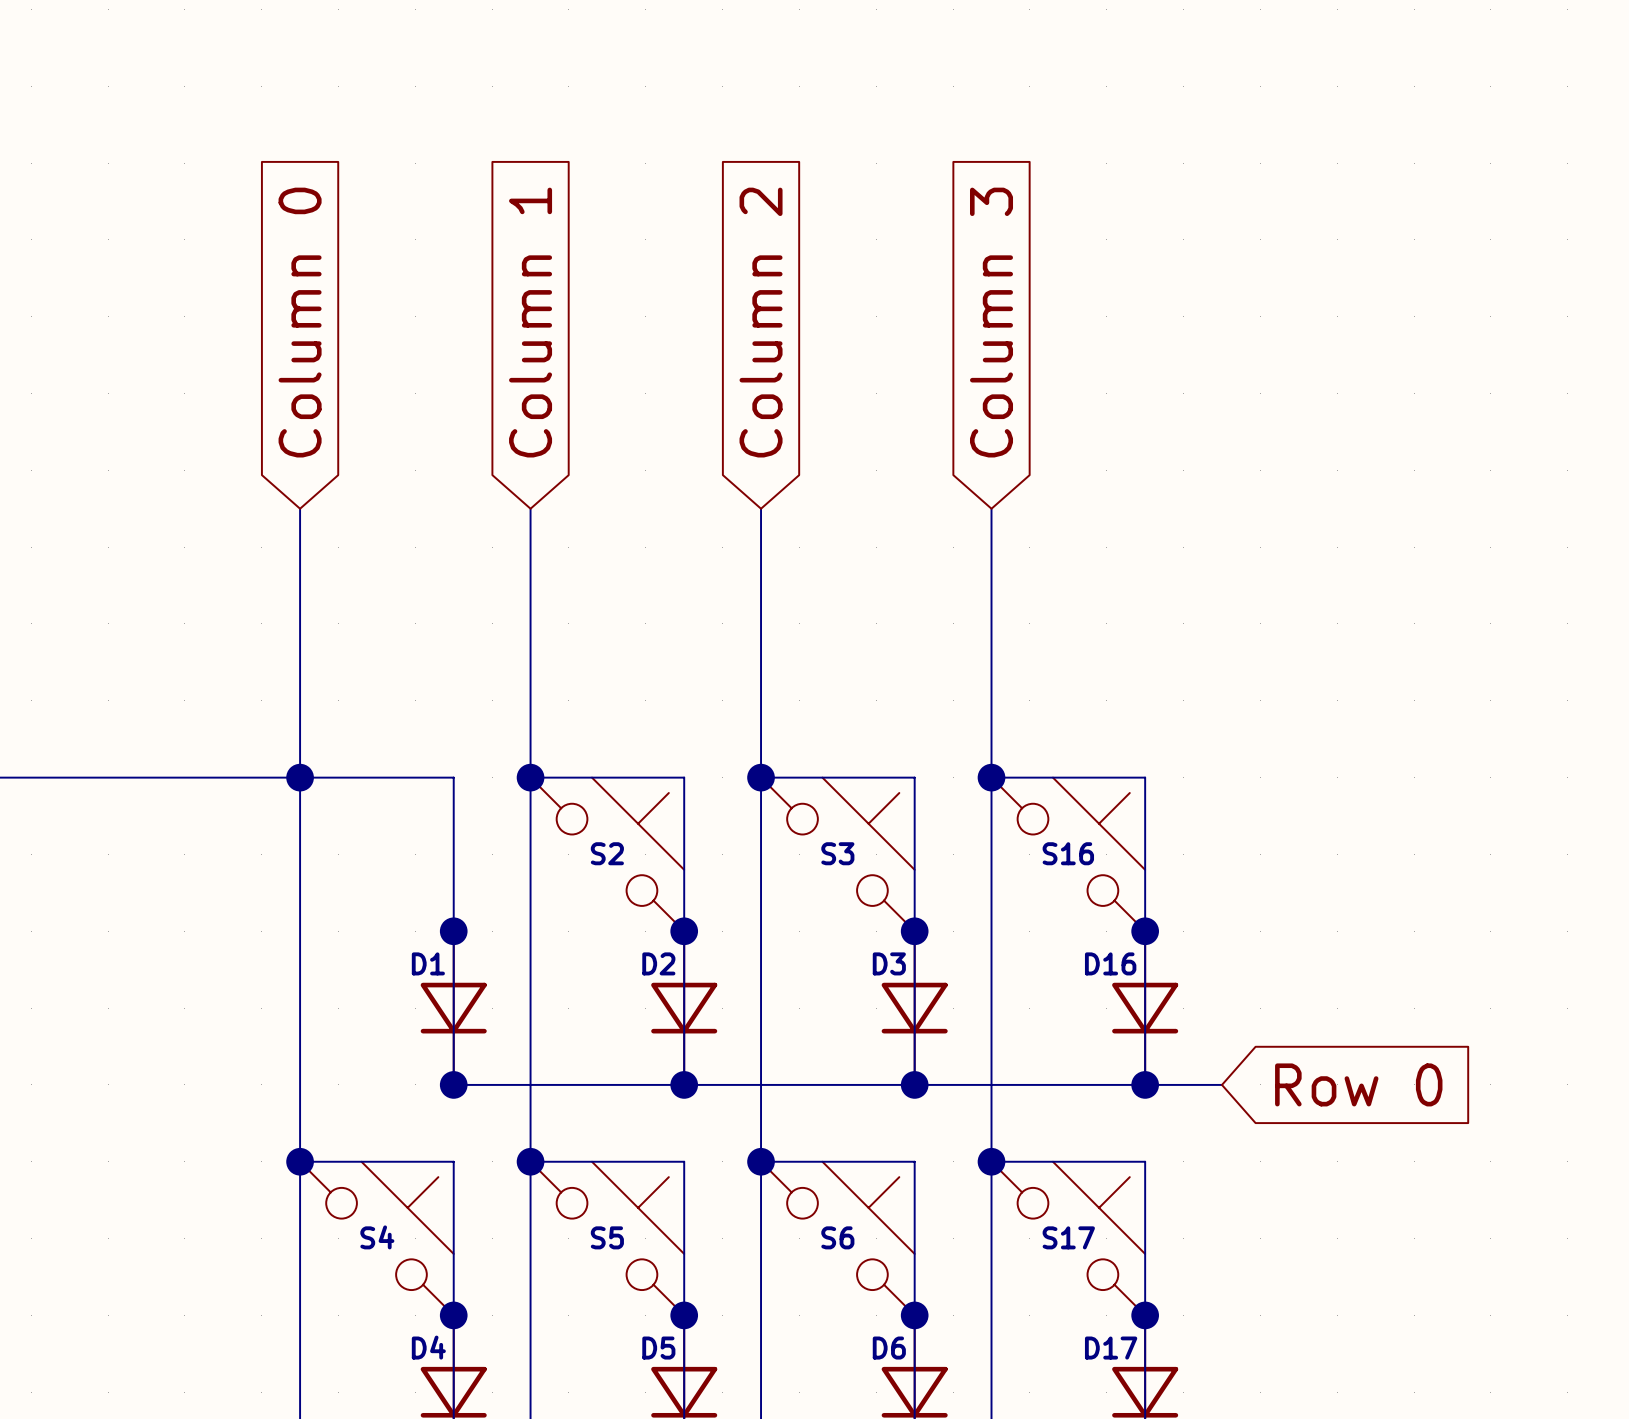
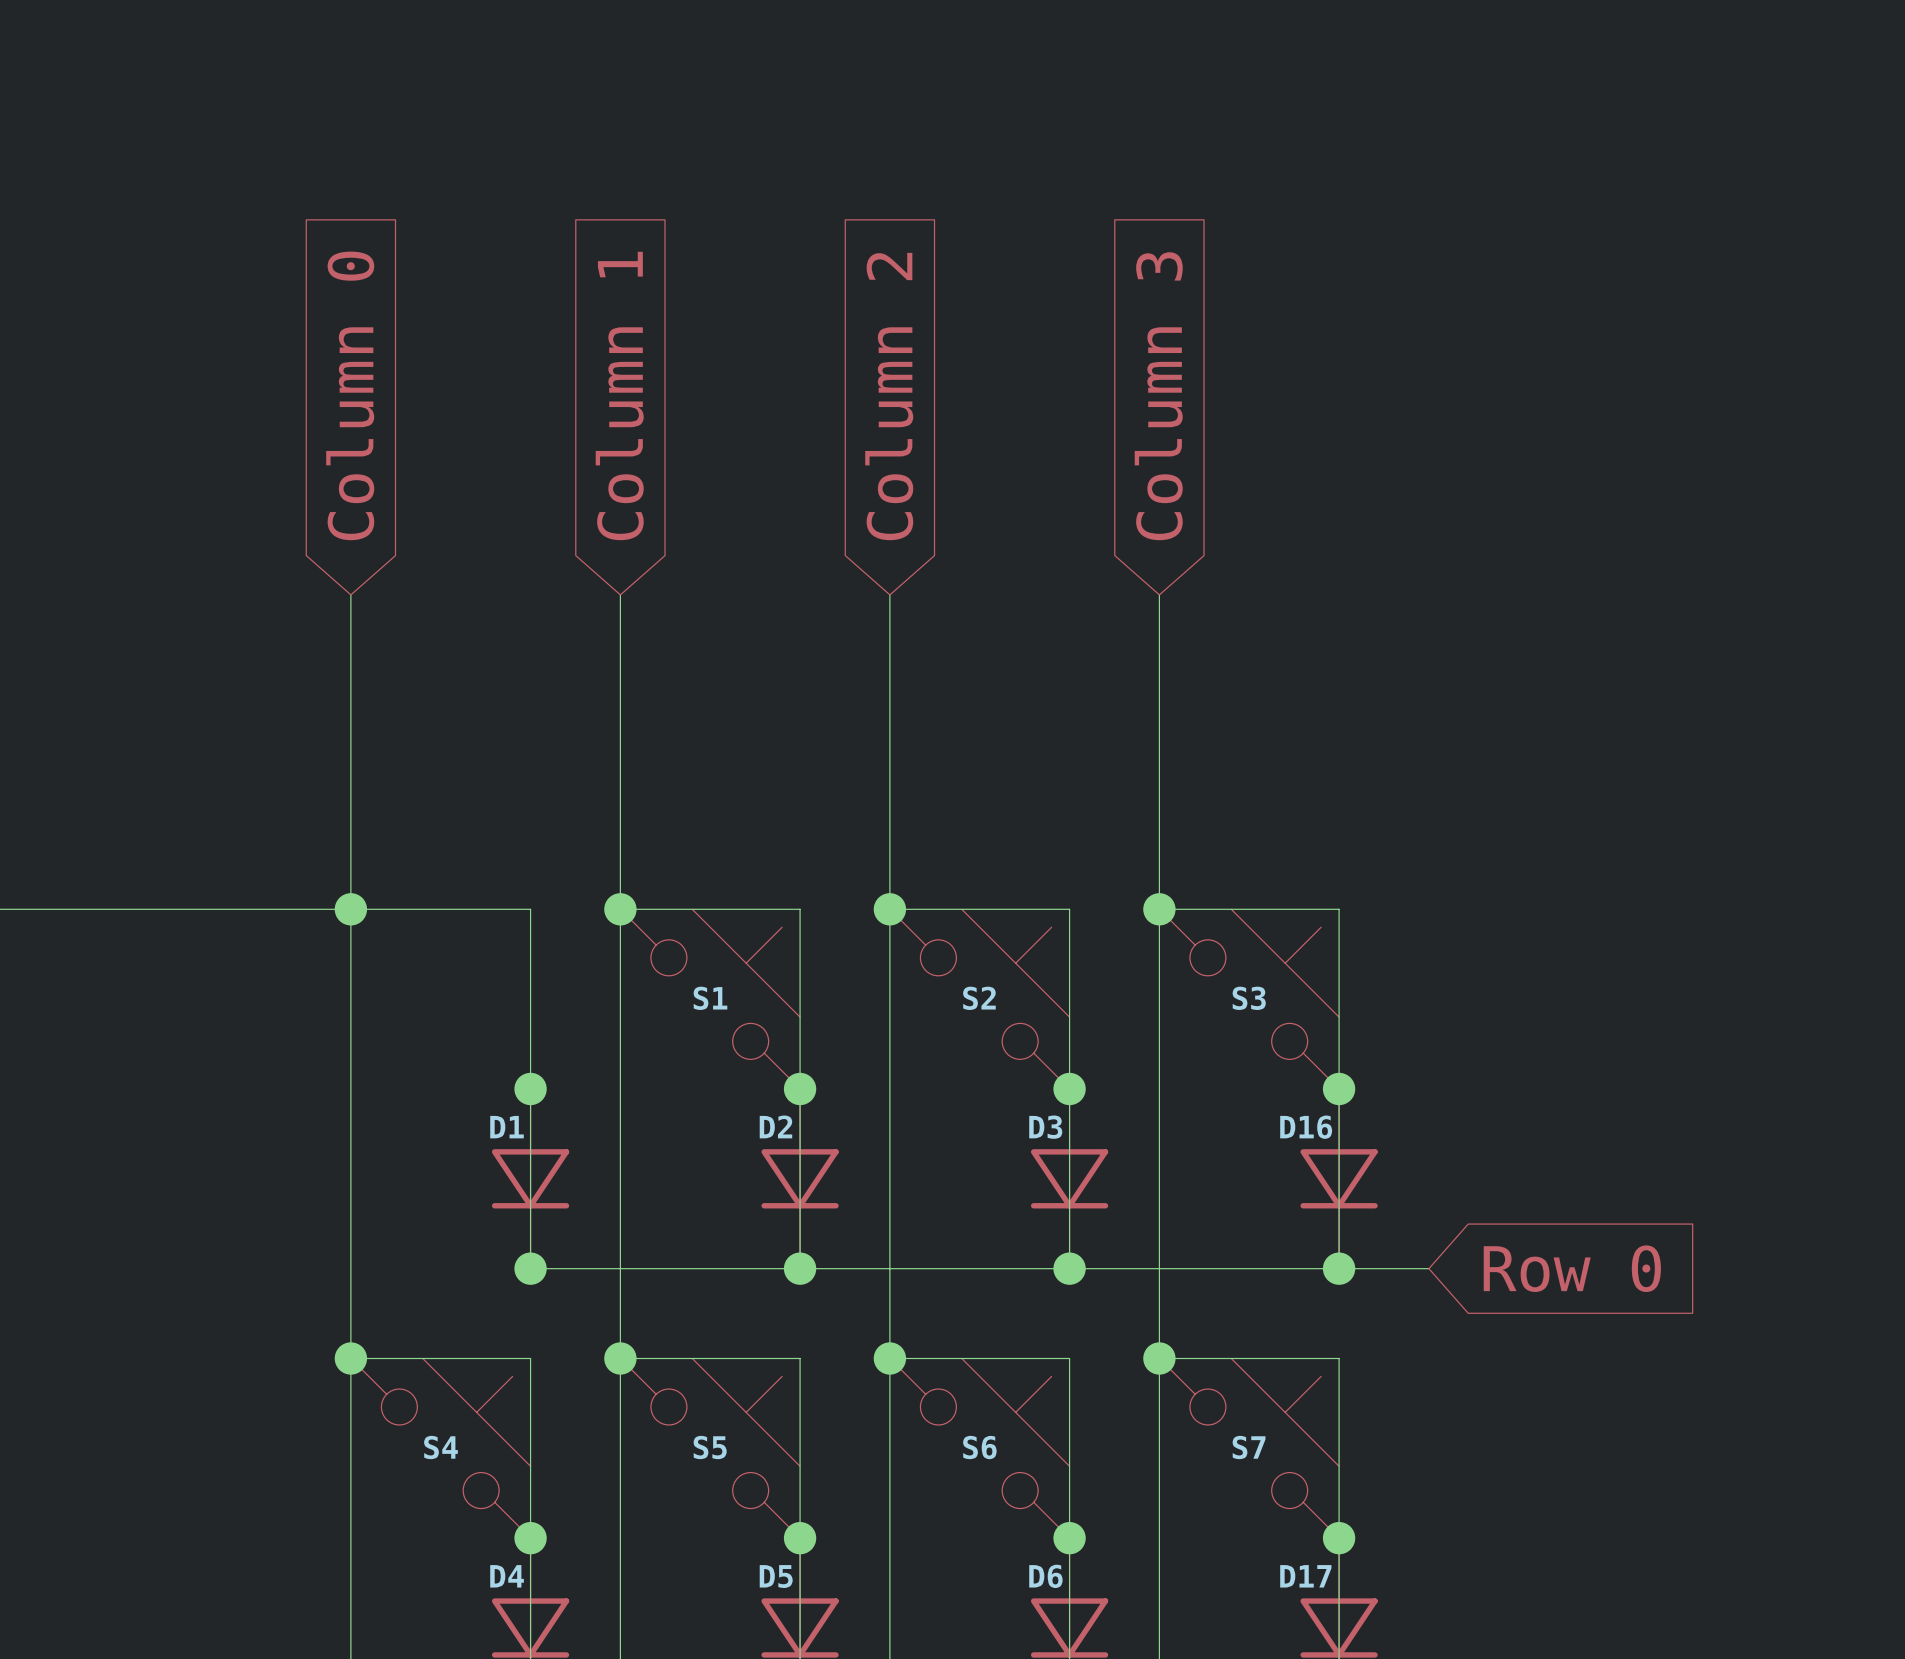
S2 name: S2 (607, 853) -> S1 (710, 998)
S3 name: S3 (837, 853) -> S2 (979, 998)
S16 name: S16 (1068, 853) -> S3 (1249, 998)
S17 name: S17 (1068, 1237) -> S7 (1249, 1447)

